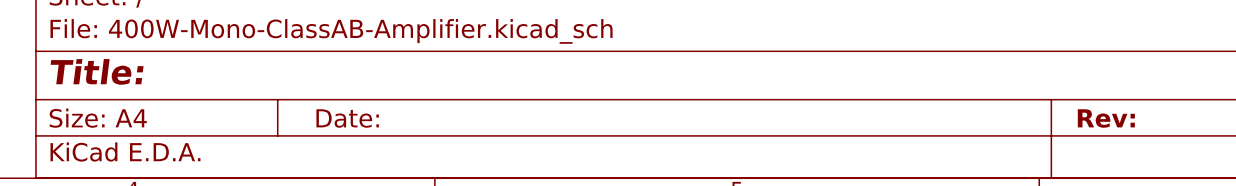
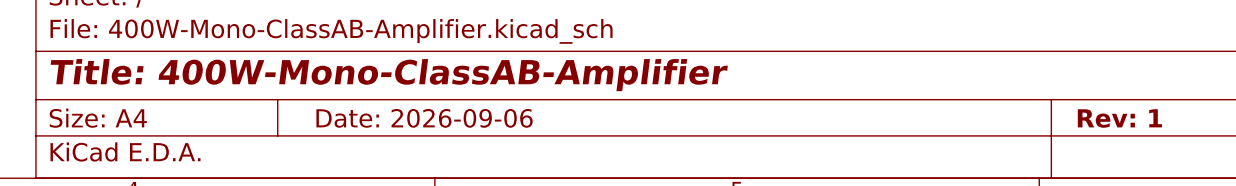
title block: Title: (97, 71) -> Title: 400W-Mono-ClassAB-Amplifier (389, 75)
title block: Date: (347, 118) -> Date: 2026-09-06 (424, 118)
title block: Rev: (1106, 118) -> Rev: 1 (1119, 118)

